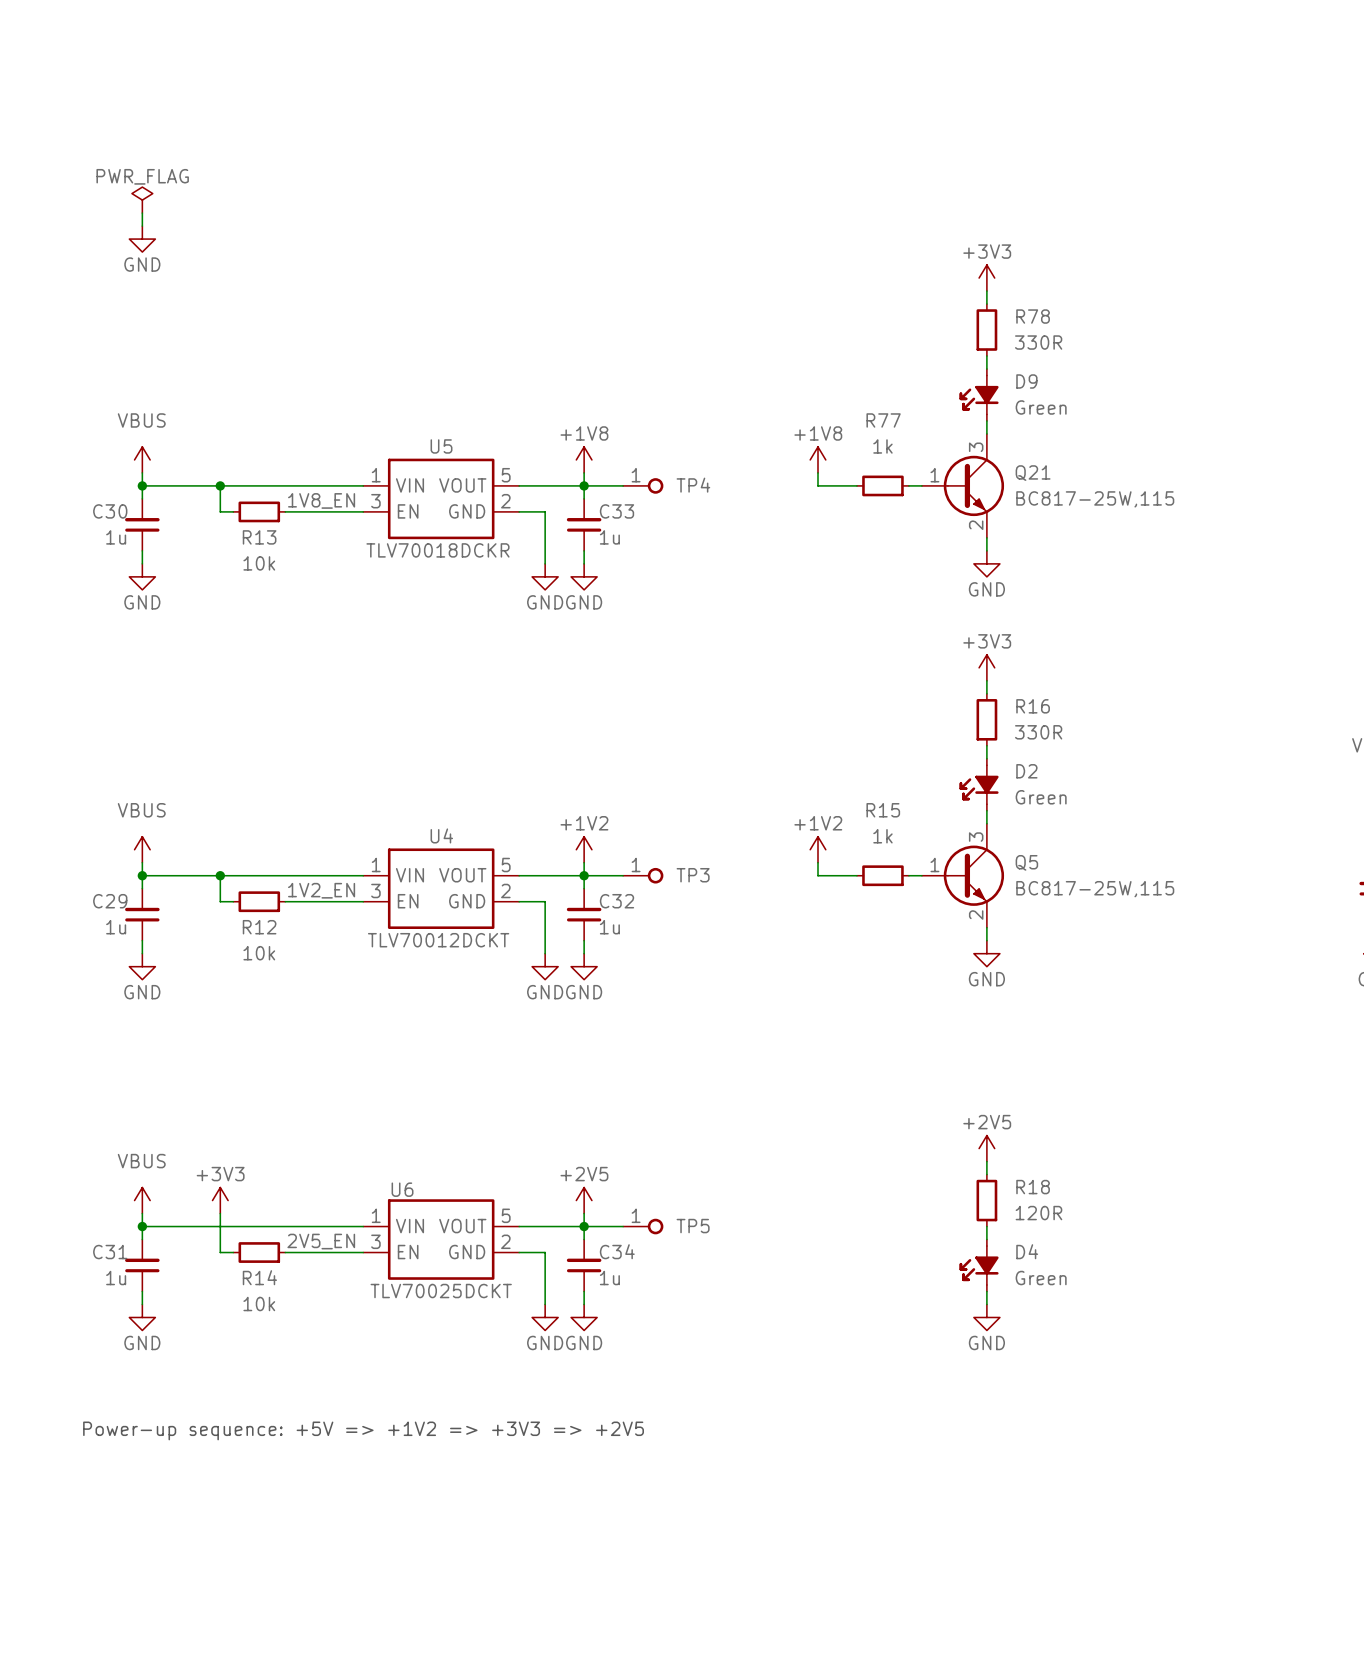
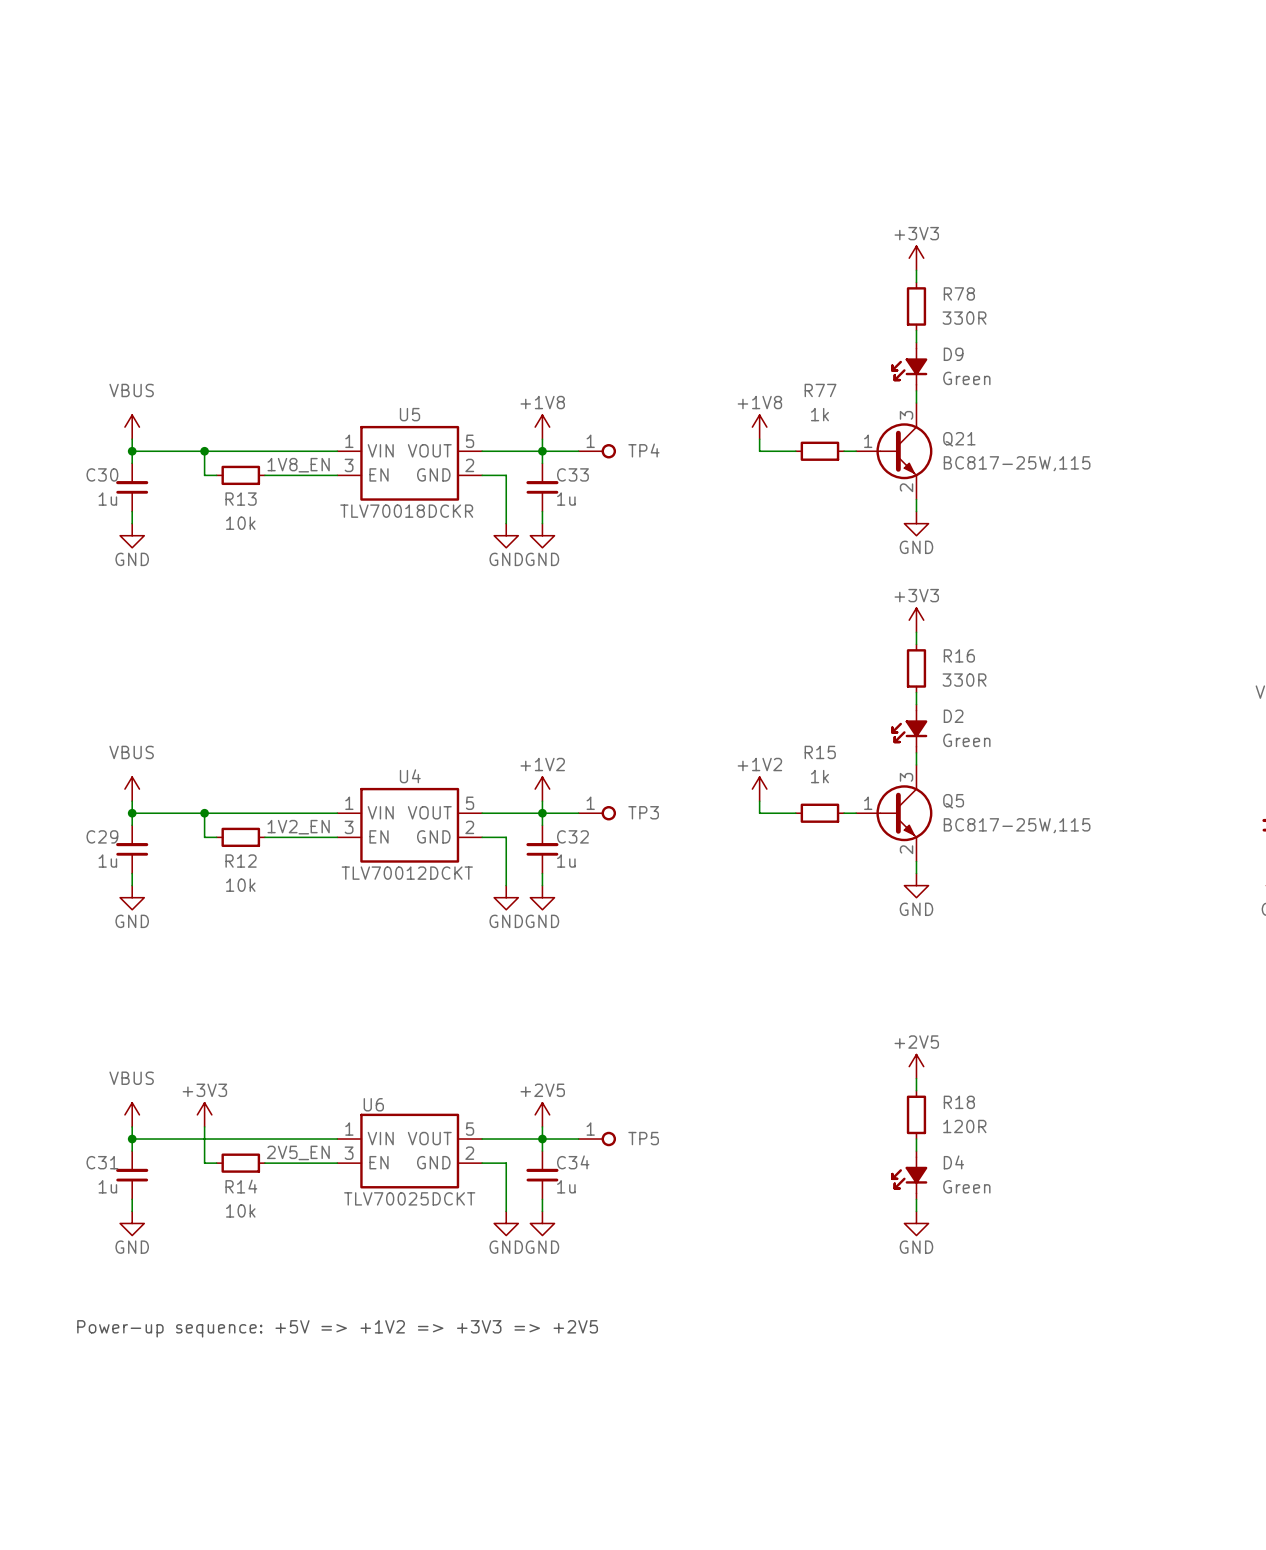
power symbol: PWR_FLAG (142, 200) -> none
wire: (142, 213) (142, 226) -> none
power symbol: GND (142, 239) -> none

